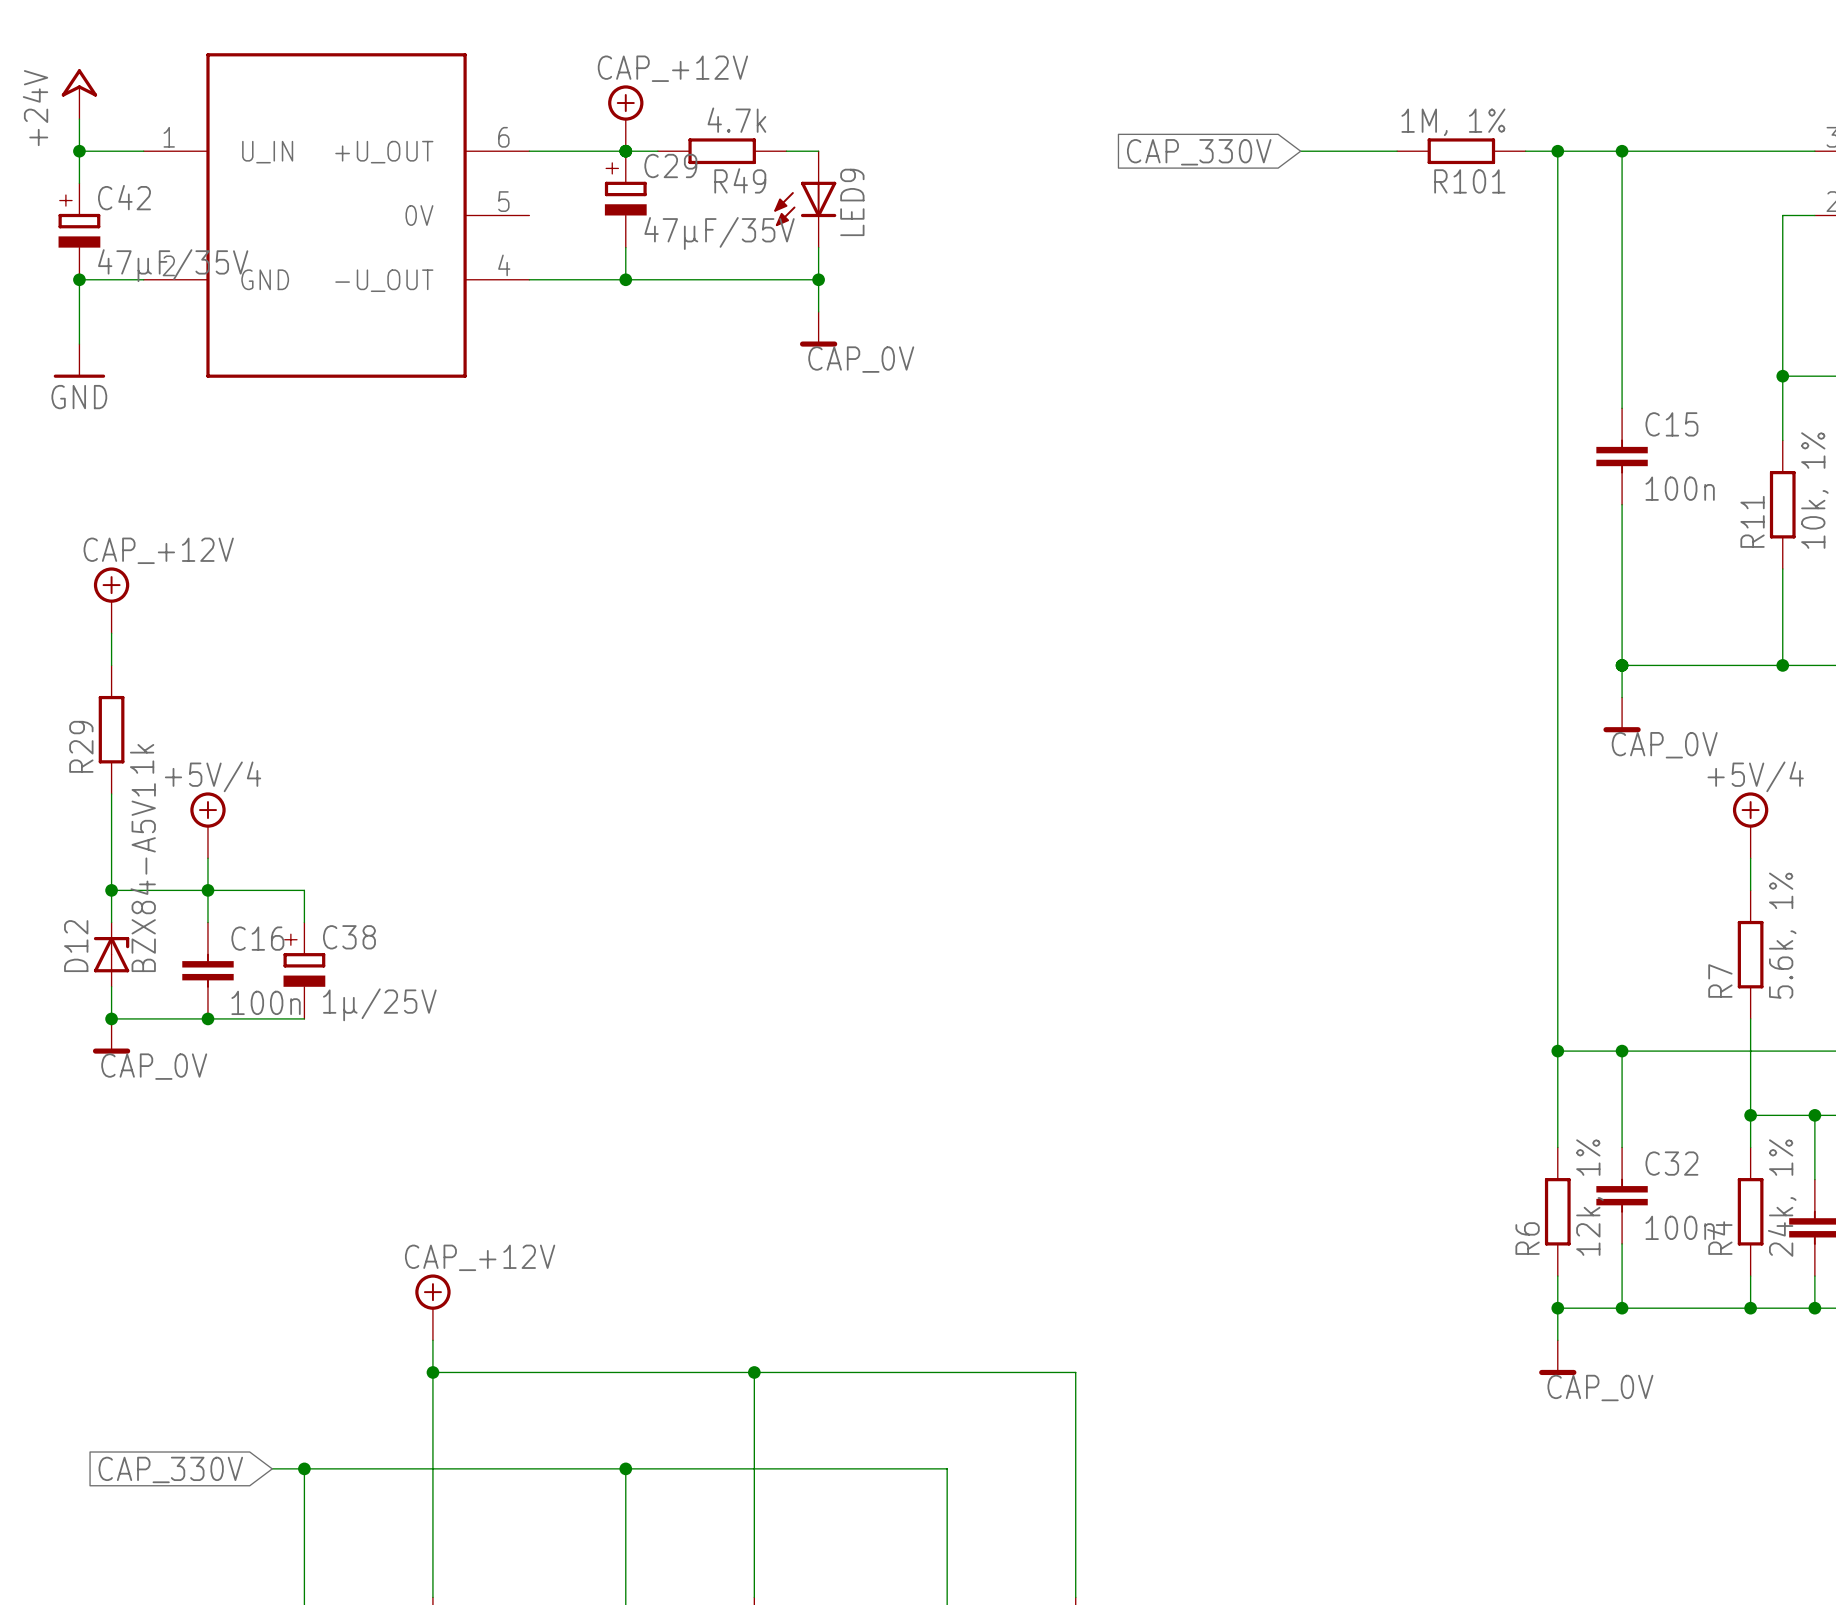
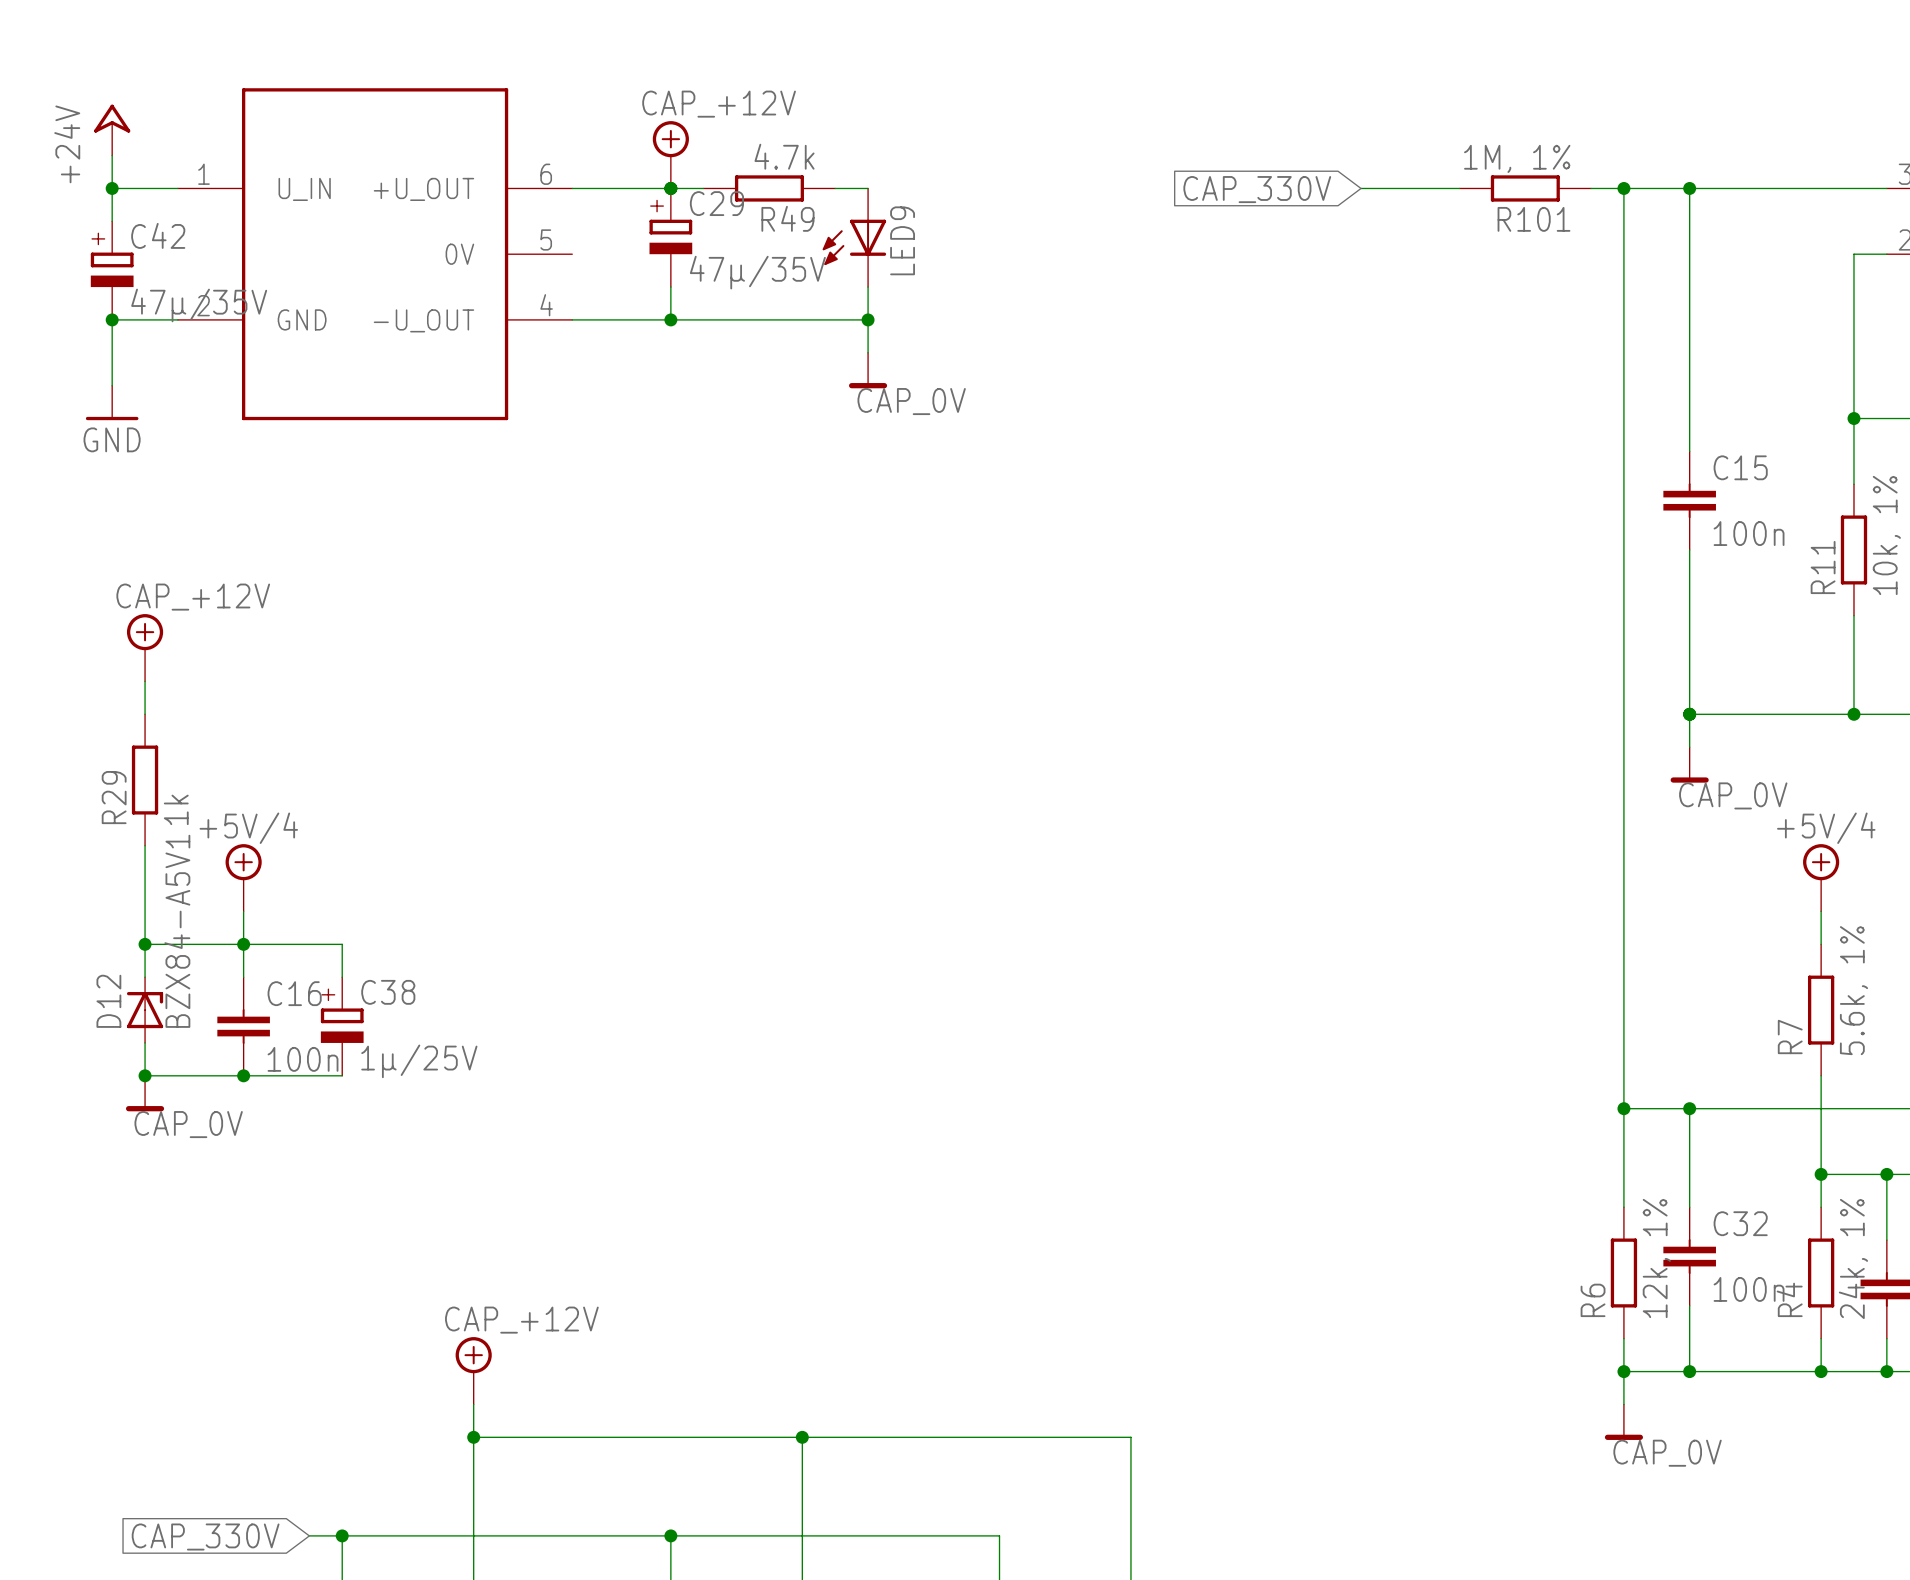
C29 value: 47µF/35V (719, 233) -> 47µ/35V (757, 272)
C42 value: 47µF/35V (173, 265) -> 47µ/35V (199, 305)

